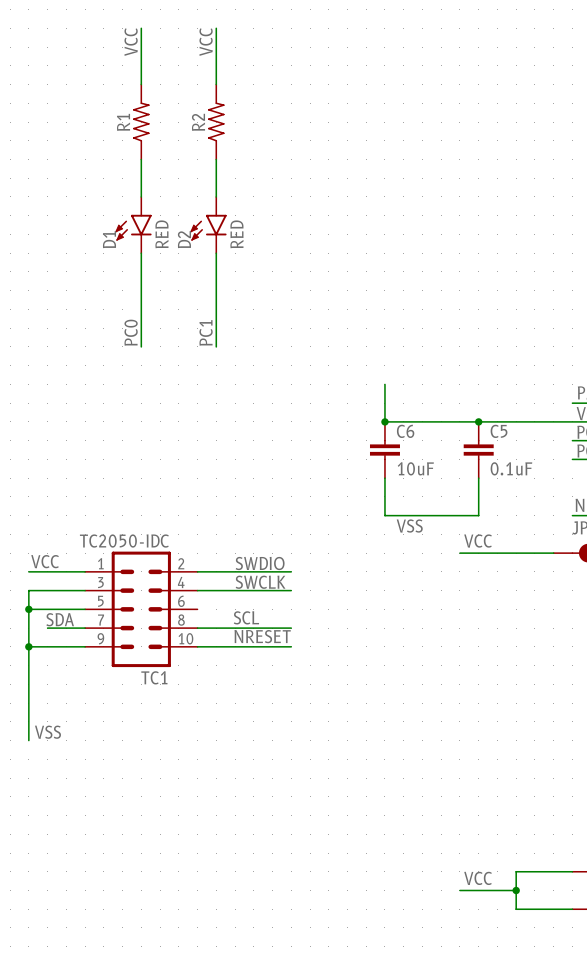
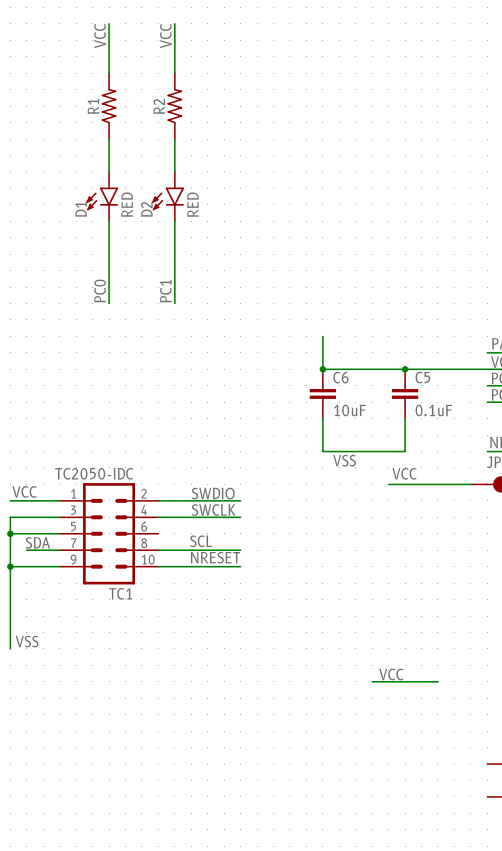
wire: none -> (372, 681) (437, 681)
wire: (572, 871) (516, 871) (516, 909) (572, 909) -> none
label position: VCC (478, 878) -> VCC (391, 674)
wire: (459, 890) (516, 890) -> none
junction: (516, 890) -> none

